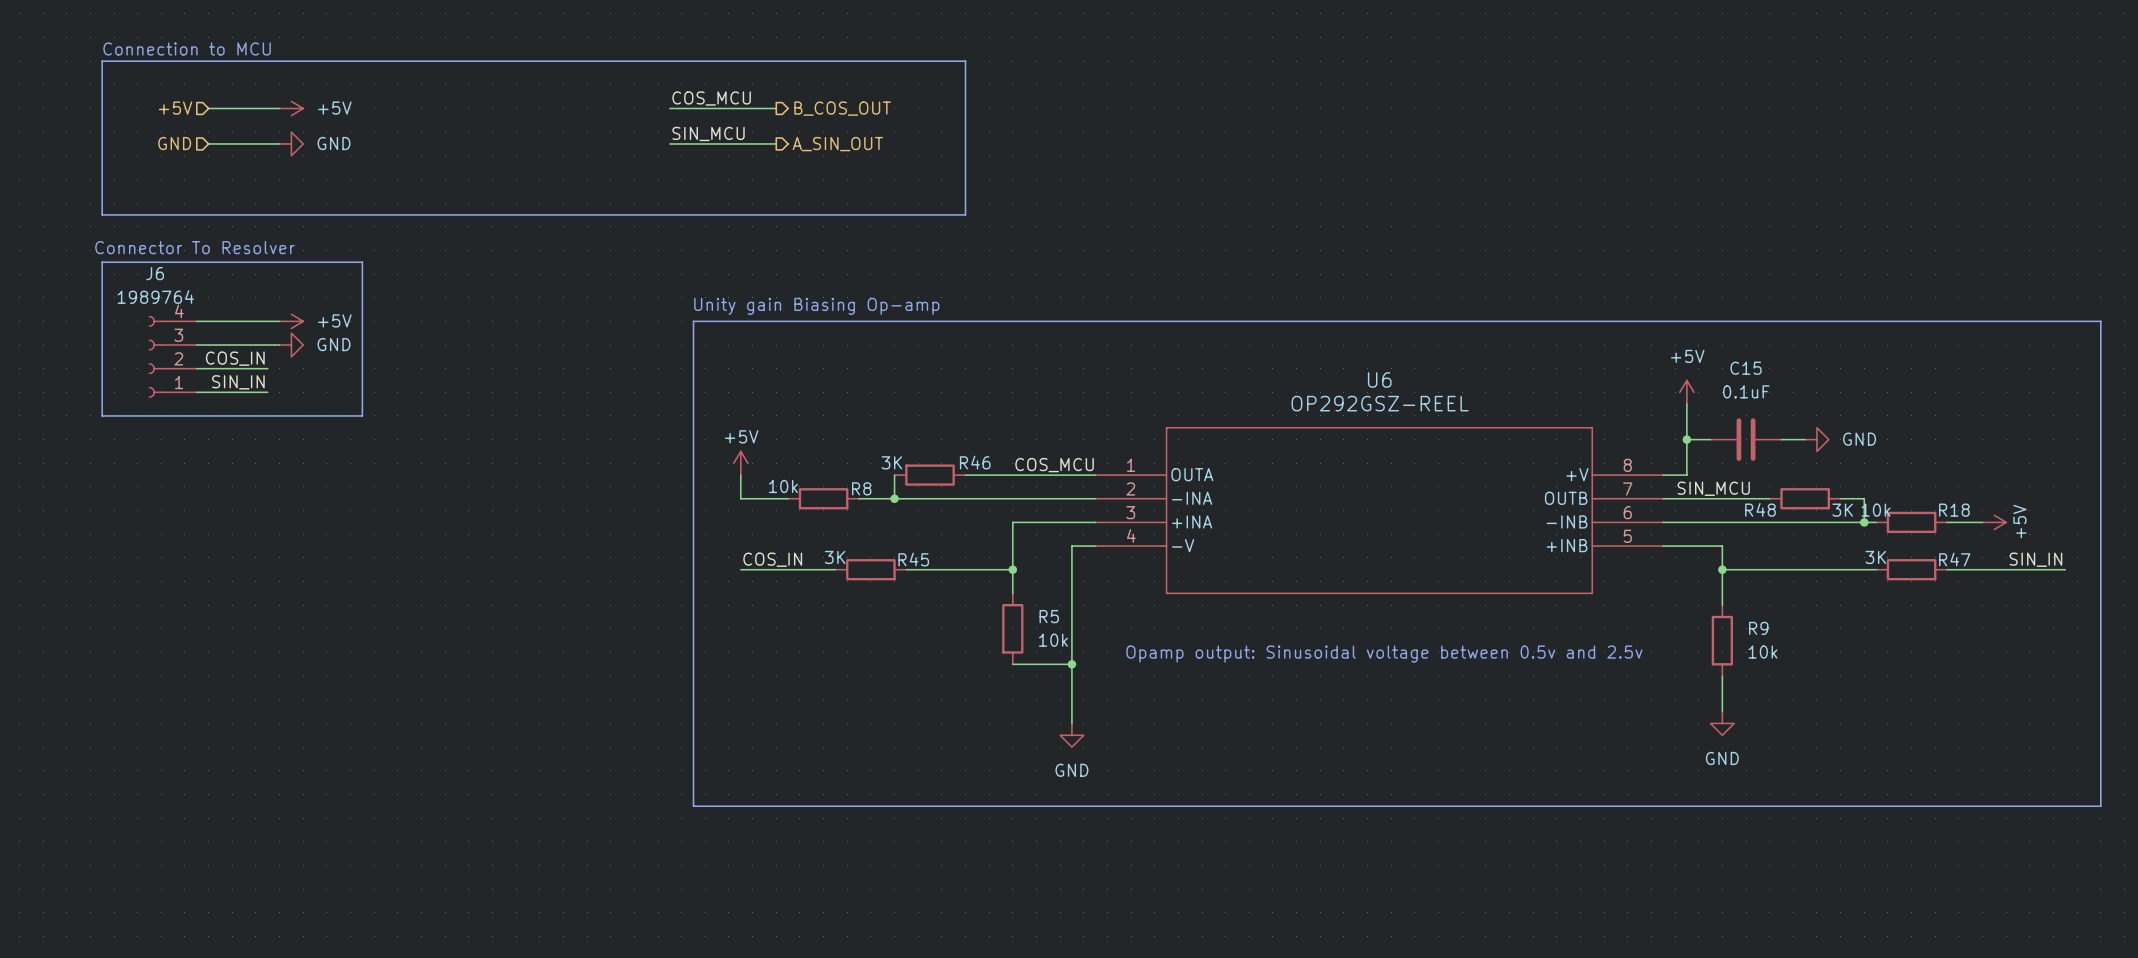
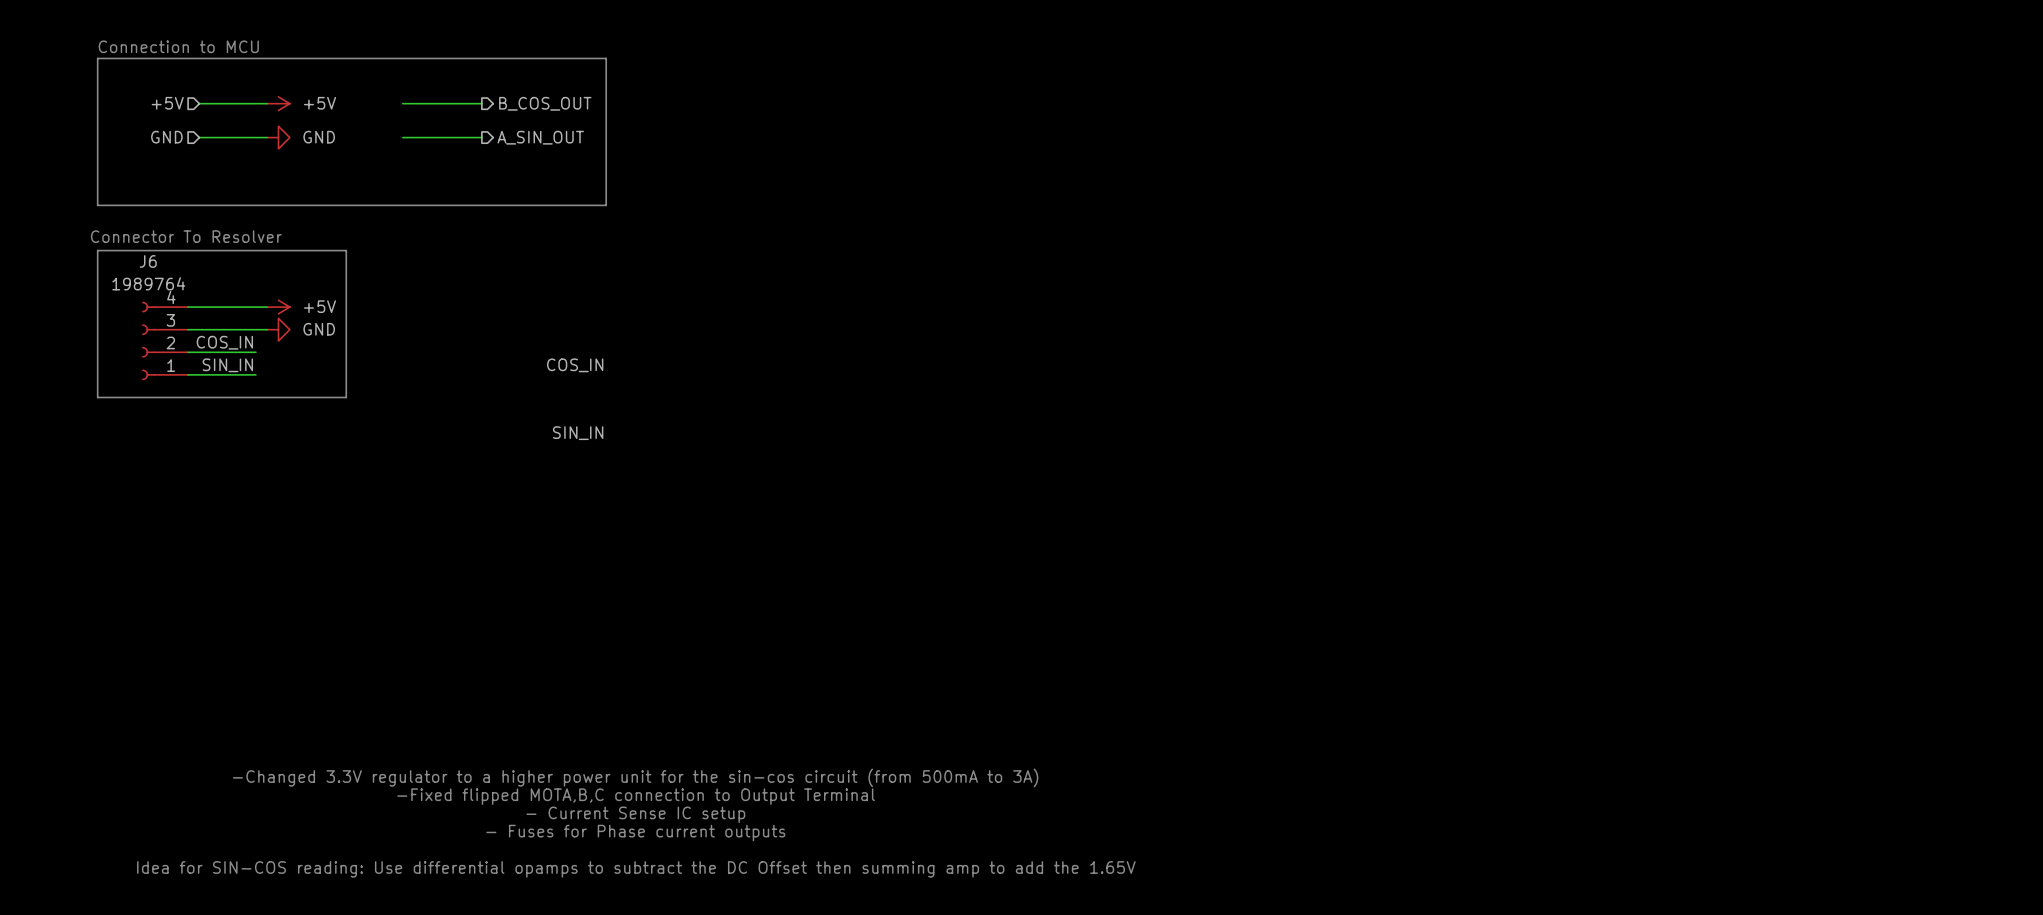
line: (634, 61) (965, 61) (965, 214) (634, 214) -> (606, 58) (606, 205)
label: COS_MCU (711, 98) -> none
wire: none -> (402, 103) (481, 103)
hierarchical label: none -> B_COS_OUT (545, 103)
wire: (669, 108) (776, 108) -> none
hierarchical label: B_COS_OUT (842, 108) -> none
label: SIN_MCU (708, 133) -> none
wire: none -> (402, 137) (481, 137)
wire: (669, 143) (776, 143) -> none
hierarchical label: none -> A_SIN_OUT (540, 137)
hierarchical label: A_SIN_OUT (837, 144) -> none
text: Unity gain Biasing Op-amp (816, 306) -> none
line: (693, 321) (2100, 321) (2100, 806) (693, 806) (693, 321) -> none
power symbol: +5V (1686, 392) -> none
wire: (1686, 404) (1686, 475) (1663, 475) -> none
wire: (1686, 439) (1710, 439) -> none
junction: (1686, 439) -> none
C15: 0.1uF (1746, 439) -> none
wire: (1781, 439) (1805, 439) -> none
power symbol: GND (1816, 439) -> none
label: none -> SIN_IN (578, 433)
power symbol: +5V (740, 463) -> none
label: COS_MCU (1054, 465) -> none
wire: (740, 475) (740, 498) (788, 498) -> none
wire: (894, 475) (894, 498) -> none
R46: 3K (930, 475) -> none
wire: (965, 475) (1095, 475) -> none
label: SIN_MCU (1713, 488) -> none
R8: 10k (823, 498) -> none
wire: (859, 498) (1095, 498) -> none
junction: (894, 498) -> none
wire: (1663, 498) (1769, 498) -> none
R48: 3K (1805, 498) -> none
wire: (1840, 498) (1864, 498) (1864, 522) -> none
U6: OP292GSZ-REEL (1379, 510) -> none
wire: (1095, 522) (1012, 522) (1012, 593) -> none
wire: (1663, 522) (1876, 522) -> none
junction: (1864, 522) -> none
R18: 10k (1911, 522) -> none
wire: (1947, 522) (1982, 522) -> none
power symbol: +5V (1994, 522) -> none
wire: (1095, 546) (1071, 546) (1071, 723) -> none
wire: (1663, 546) (1722, 546) (1722, 605) -> none
label position: COS_IN (772, 559) -> COS_IN (575, 365)
label: SIN_IN (2035, 559) -> none
wire: (740, 569) (835, 569) -> none
R45: 3K (870, 569) -> none
wire: (906, 569) (1012, 569) -> none
junction: (1012, 569) -> none
wire: (1722, 569) (1876, 569) -> none
junction: (1722, 569) -> none
R47: 3K (1911, 569) -> none
wire: (1947, 569) (2065, 569) -> none
R5: 10k (1012, 628) -> none
R9: 10k (1722, 640) -> none
text: Opamp output: Sinusoidal voltage between 0.5v and 2.5v (1384, 654) -> none
wire: (1012, 664) (1071, 664) -> none
junction: (1071, 664) -> none
wire: (1722, 676) (1722, 711) -> none
power symbol: GND (1722, 723) -> none
power symbol: GND (1071, 735) -> none
text: none -> -Changed 3.3V regulator to a higher power unit for the sin-cos circuit (from 500mA to 3A) (635, 777)
text: none -> -Fixed flipped MOTA,B,C connection to Output Terminal (636, 796)
text: none -> - Current Sense IC setup (635, 814)
text: none -> - Fuses for Phase current outputs (635, 832)
text: none -> Idea for SIN-COS reading: Use differential opamps to subtract the DC Offset then summing amp to add the 1.65V (636, 869)

